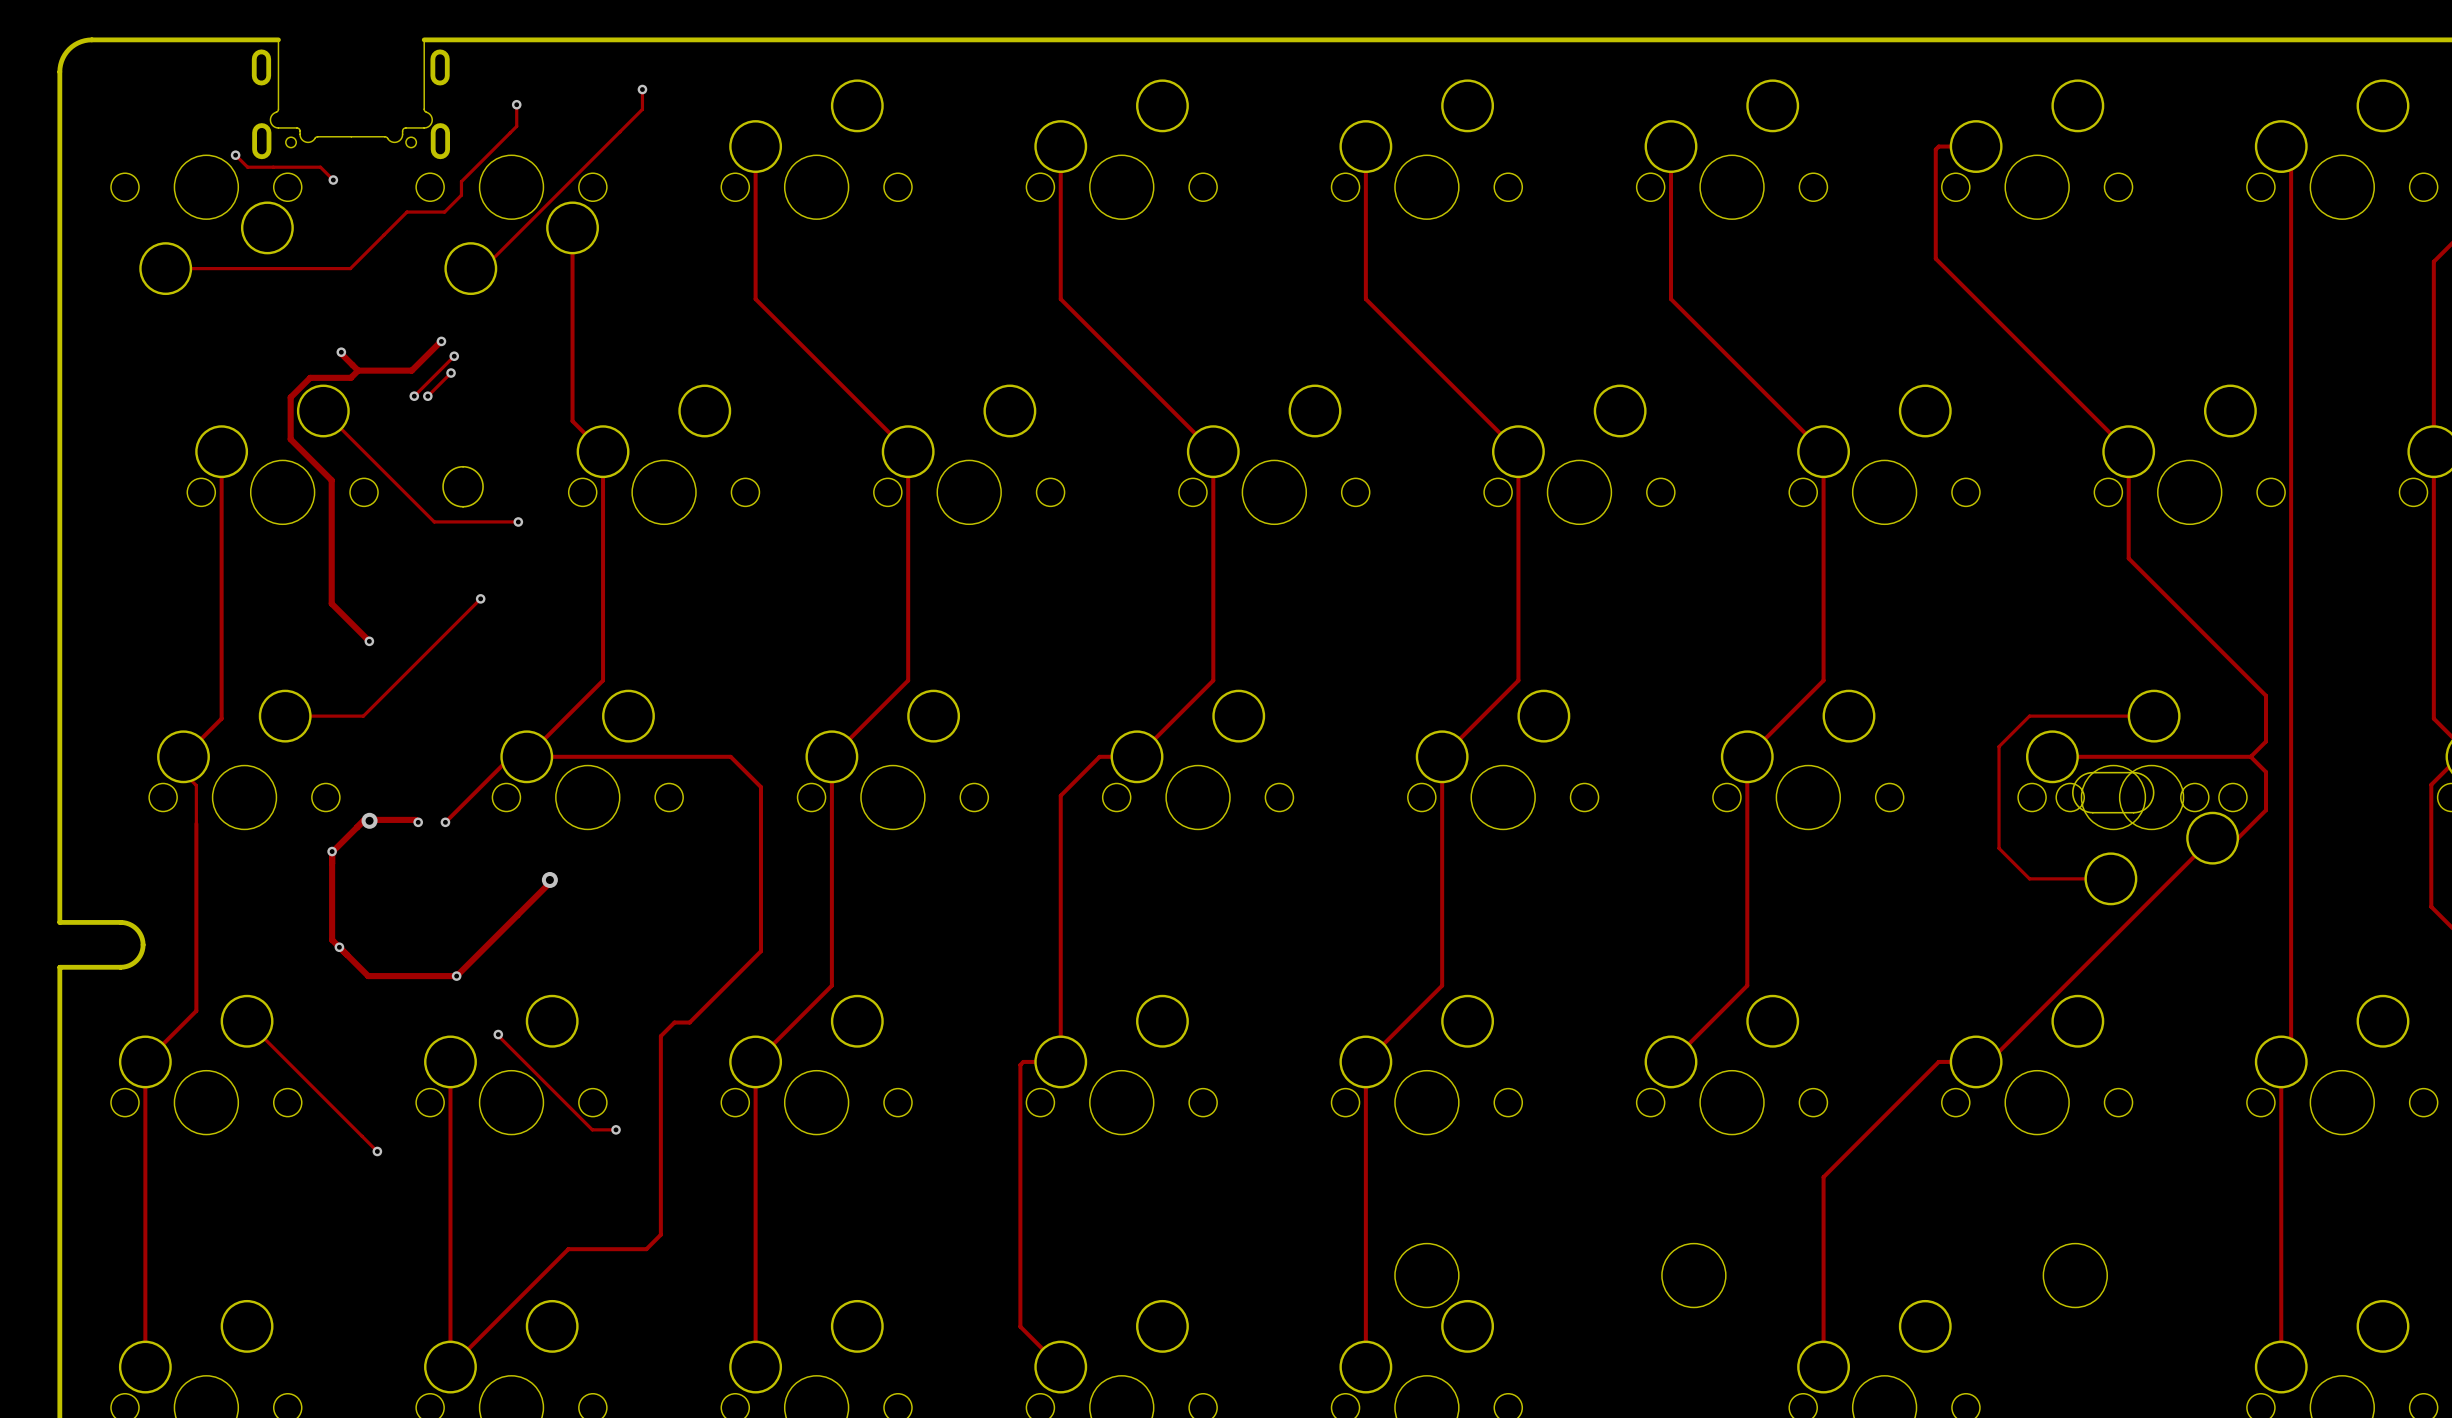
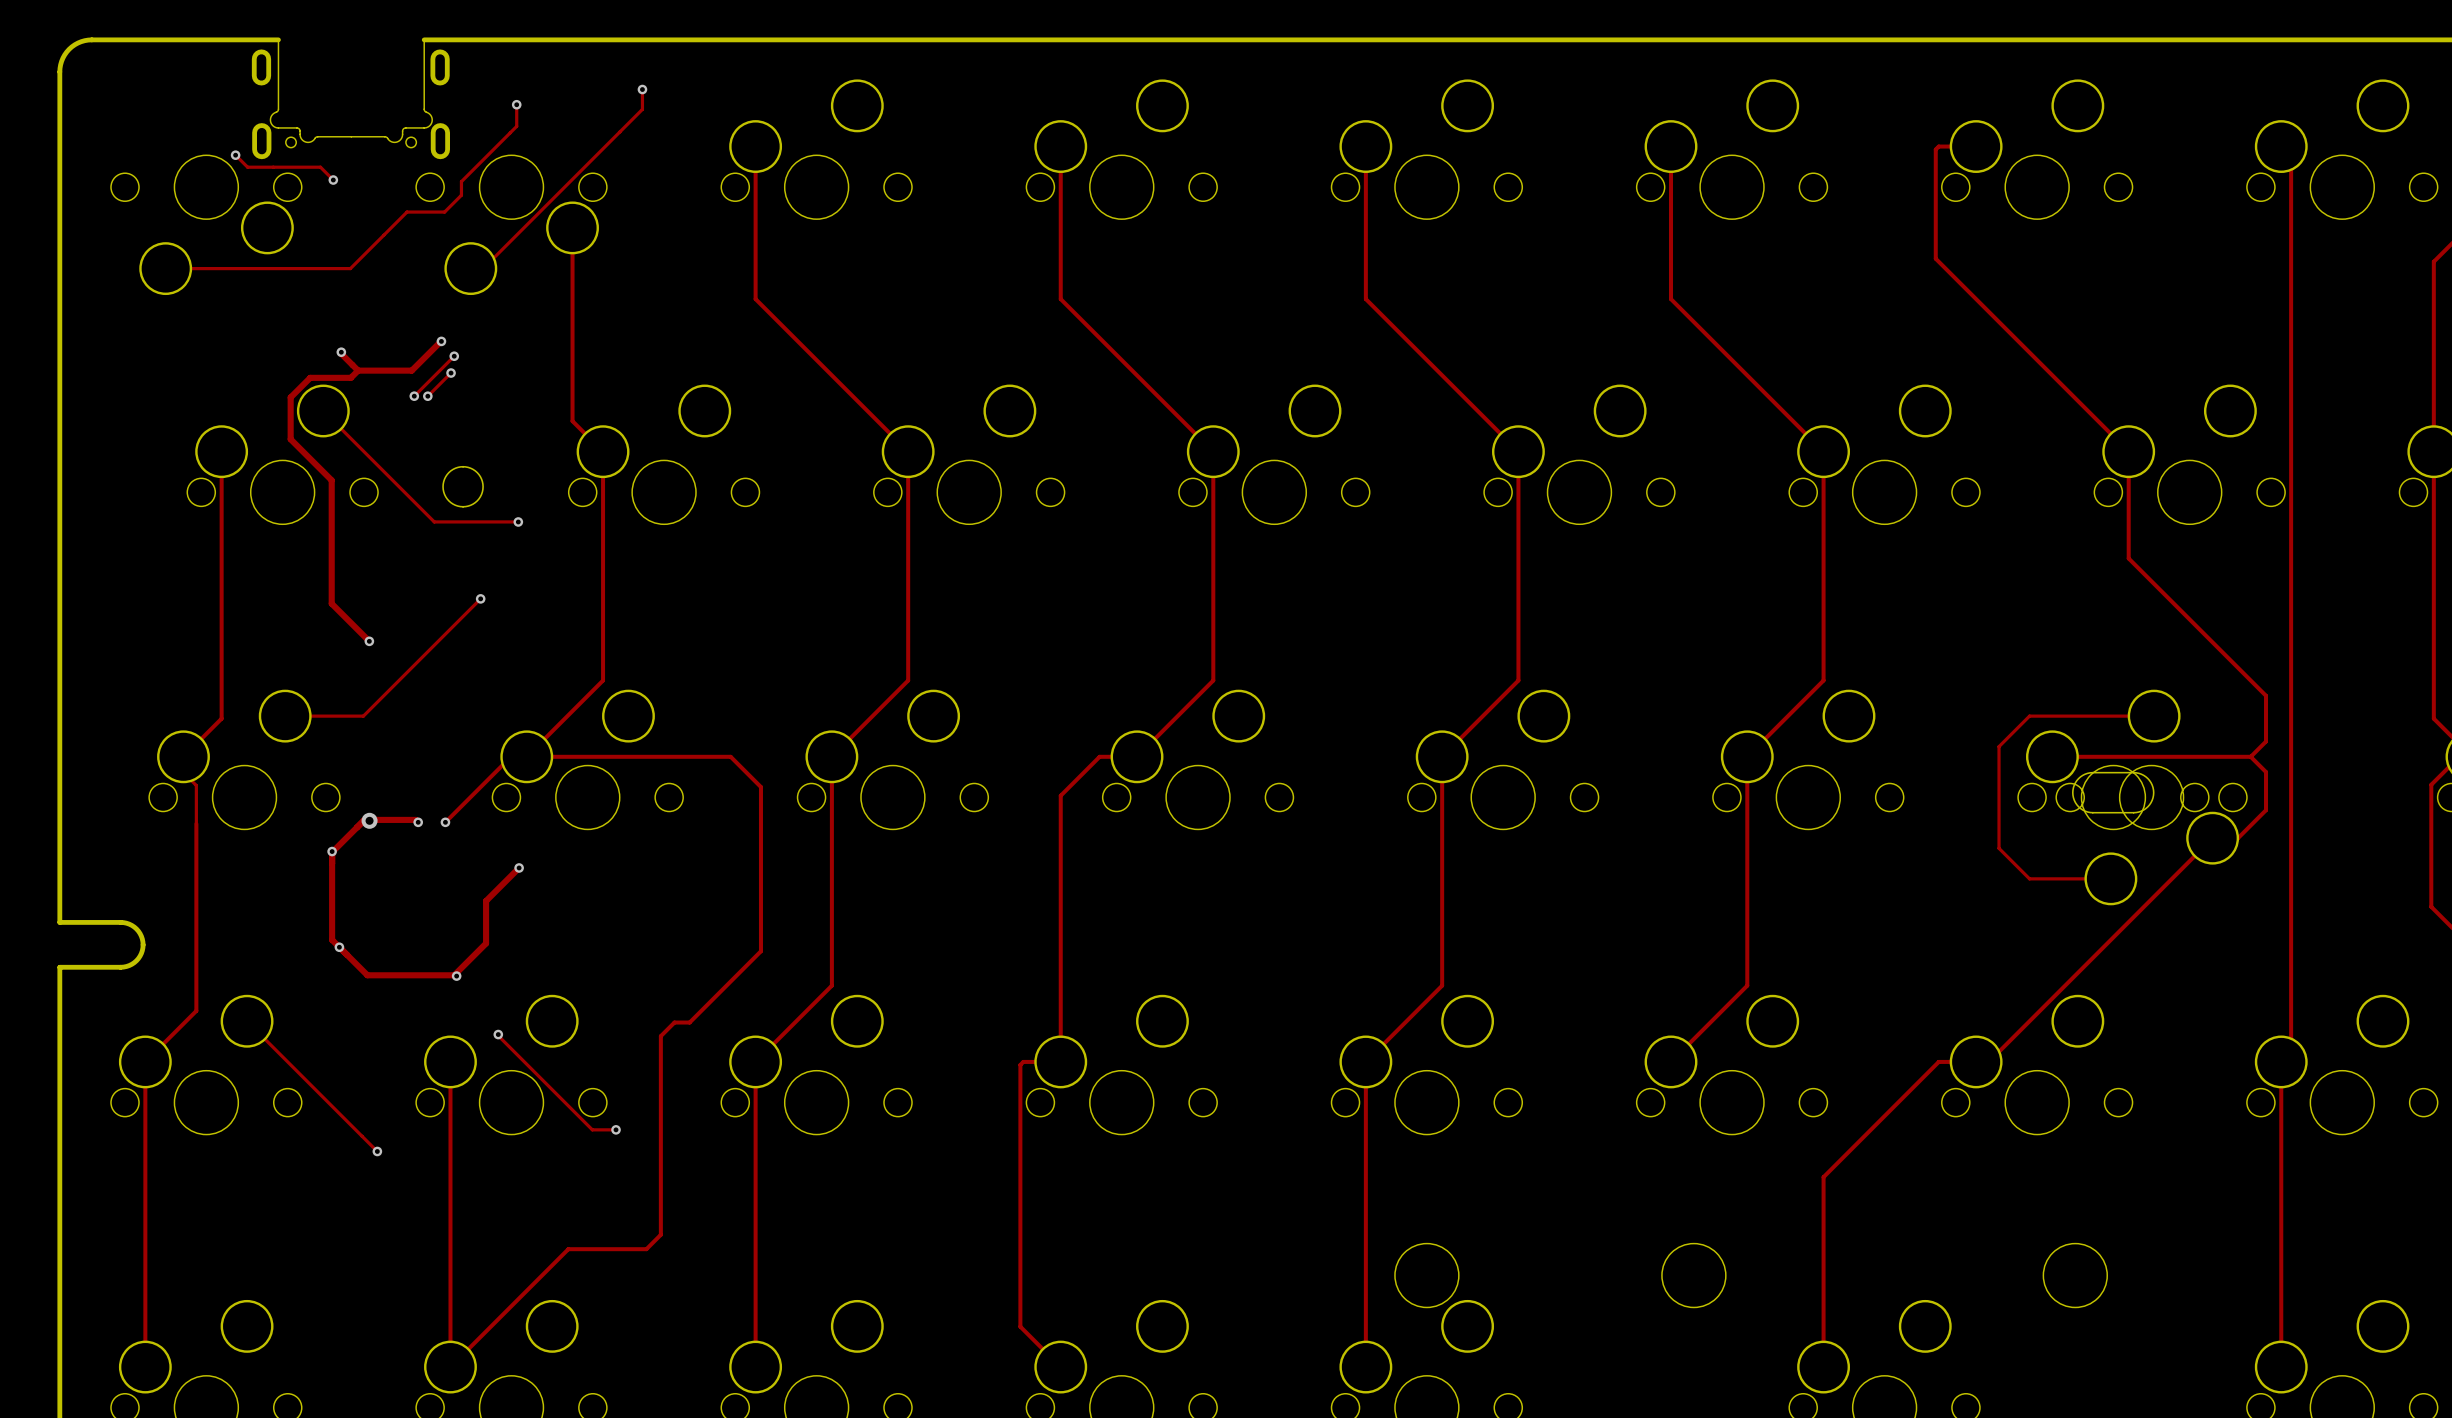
via: none -> (519, 867)
track: (549, 879) (549, 882) (456, 976) (367, 975) -> (519, 867) (486, 901) (486, 943) (454, 975) (367, 975)
via: (549, 879) -> none

